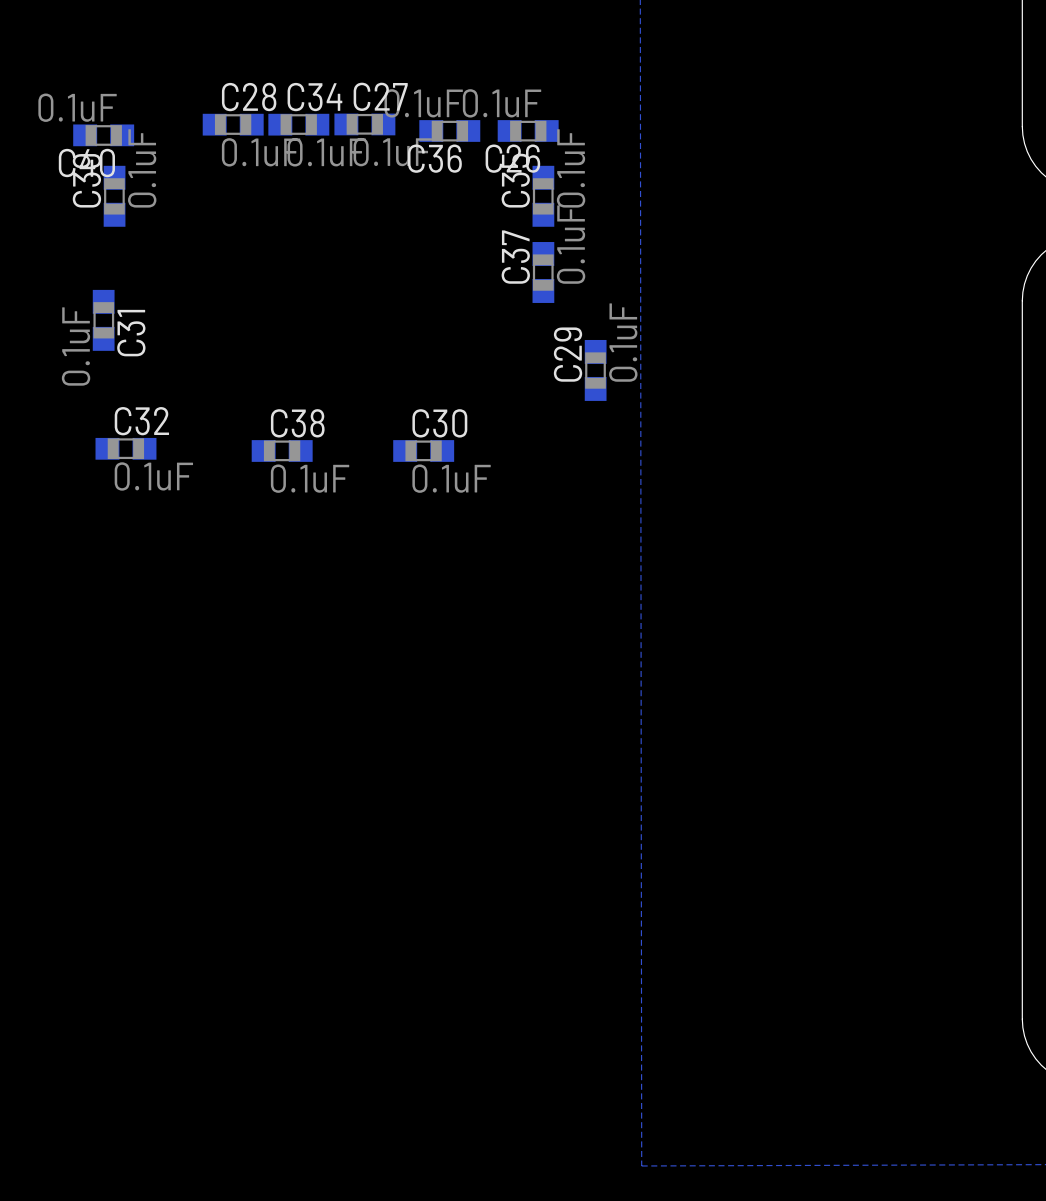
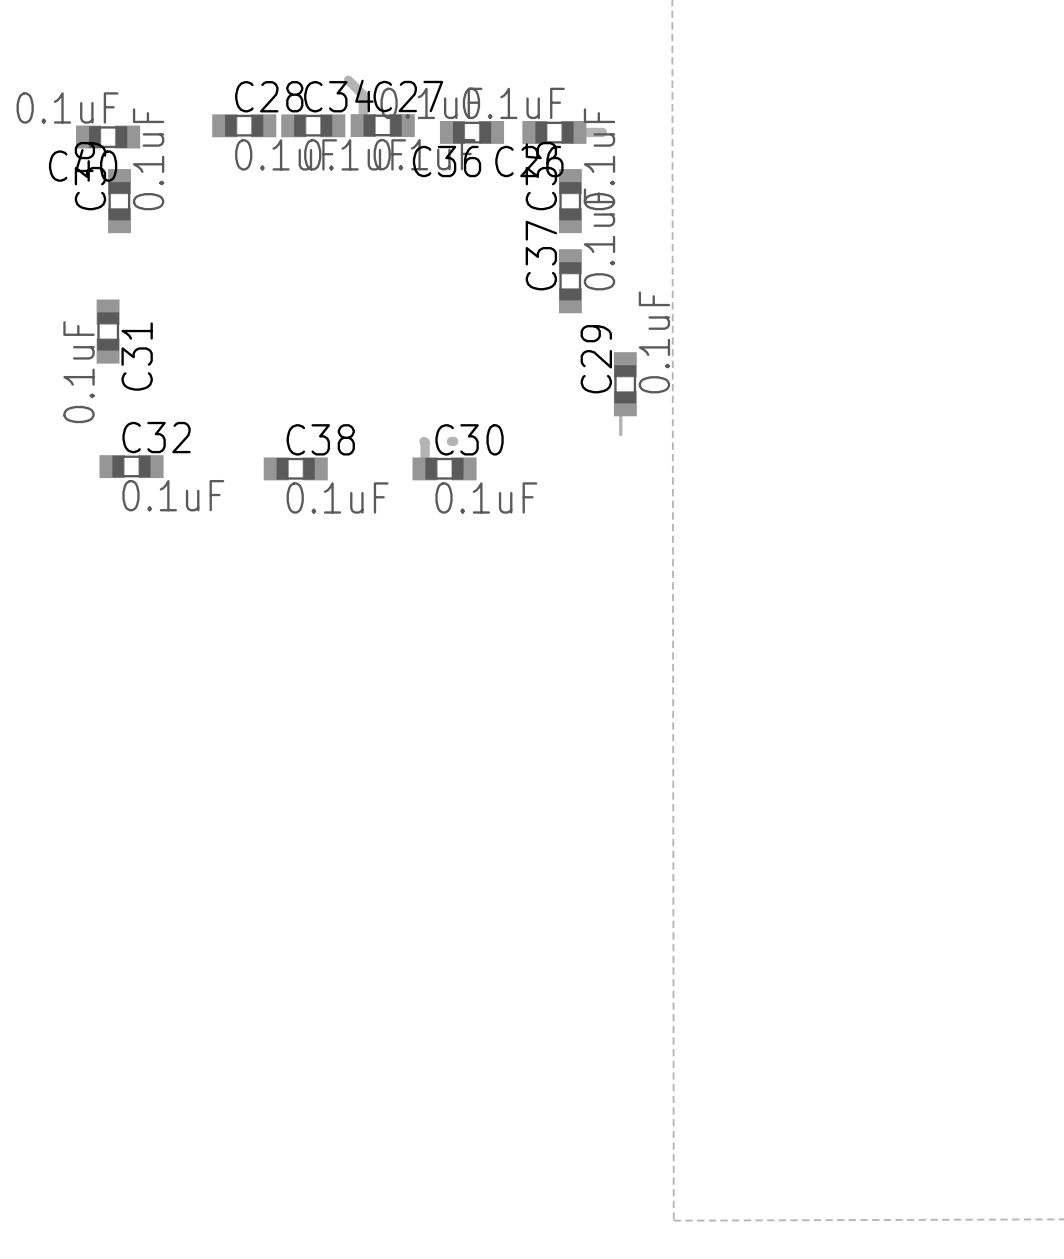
track: none -> (348, 80) (363, 95) (363, 125)
track: none -> (602, 132) (573, 132)
track: none -> (625, 403) (620, 408) (620, 434)
track: none -> (423, 441) (425, 468)
track: none -> (453, 441) (451, 441)

